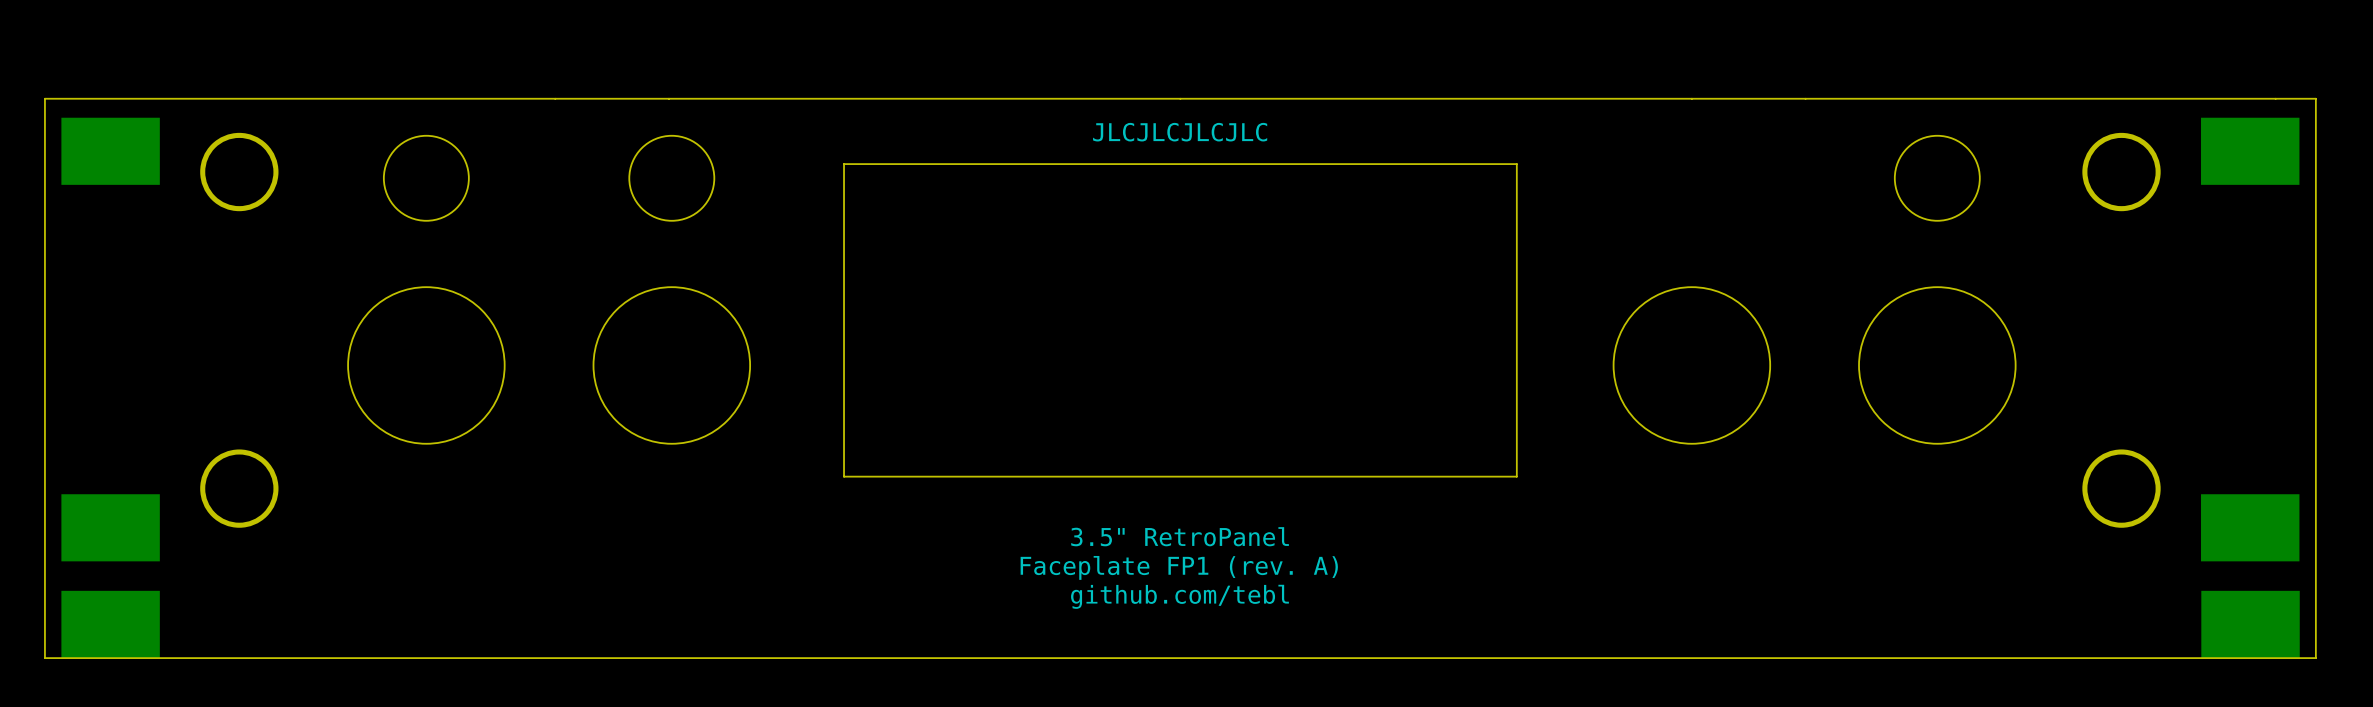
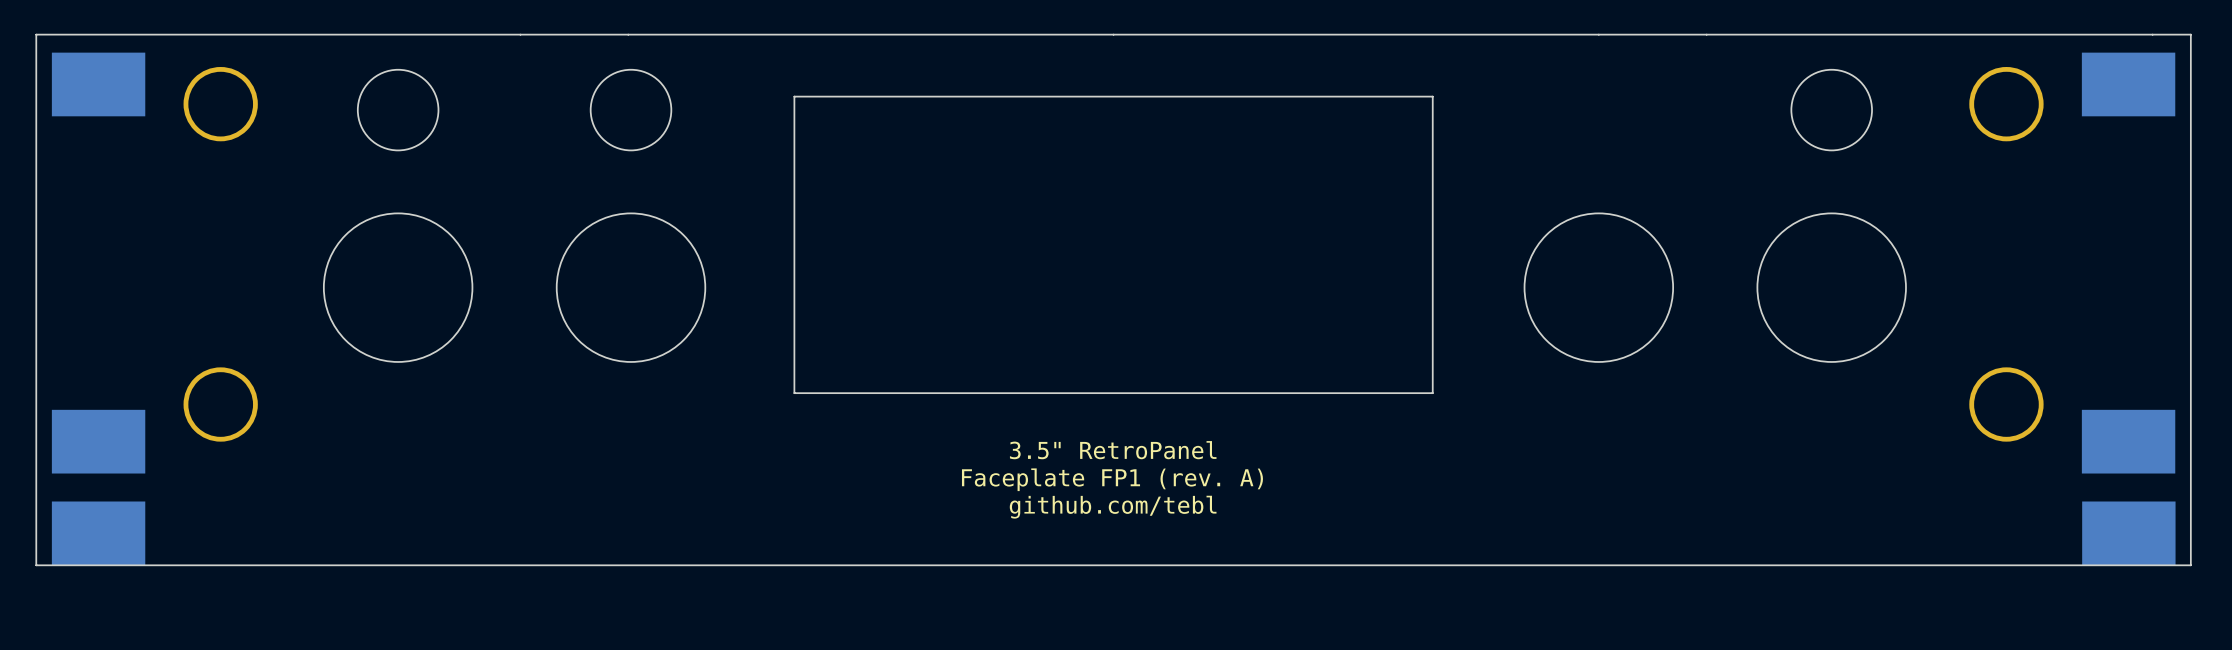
text: JLCJLCJLCJLC (1180, 132) -> none

